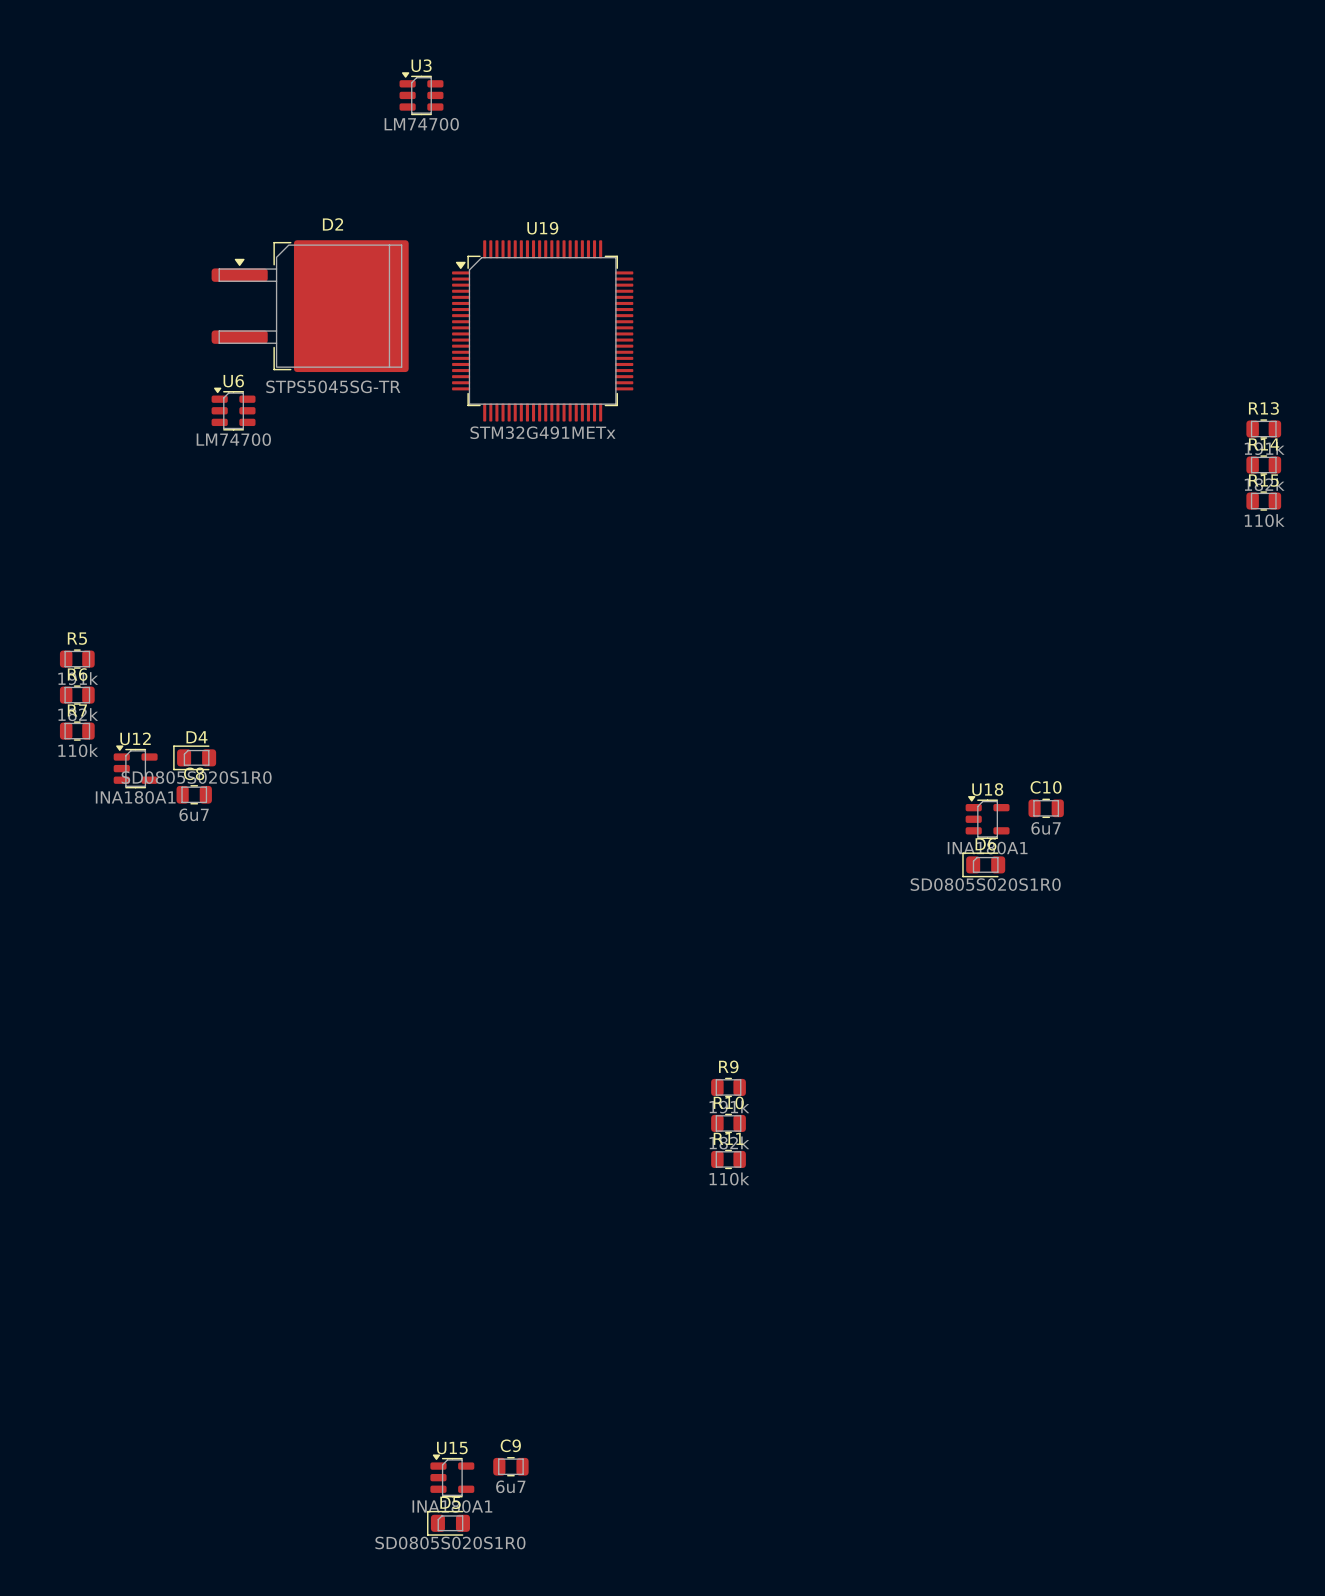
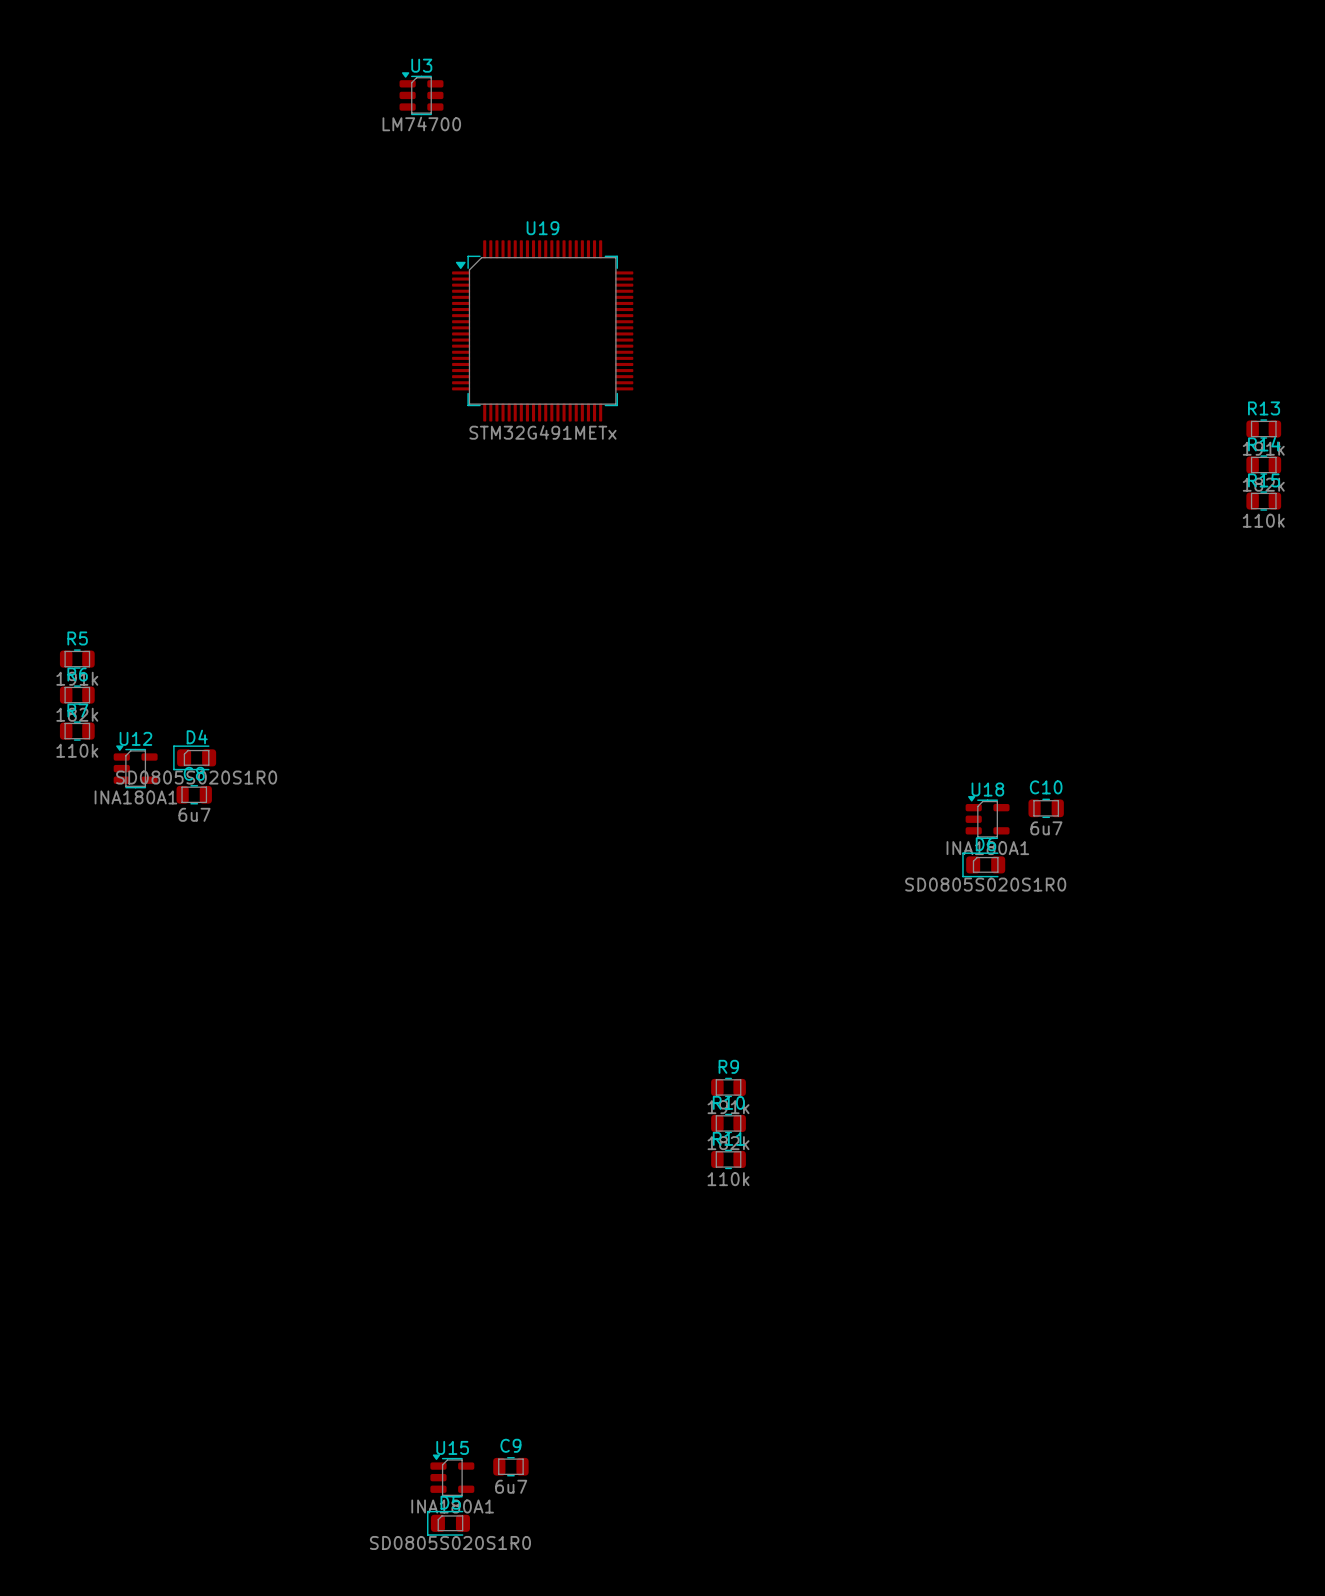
D2: STPS5045SG-TR (310, 306) -> none
U6: LM74700 (233, 409) -> none

